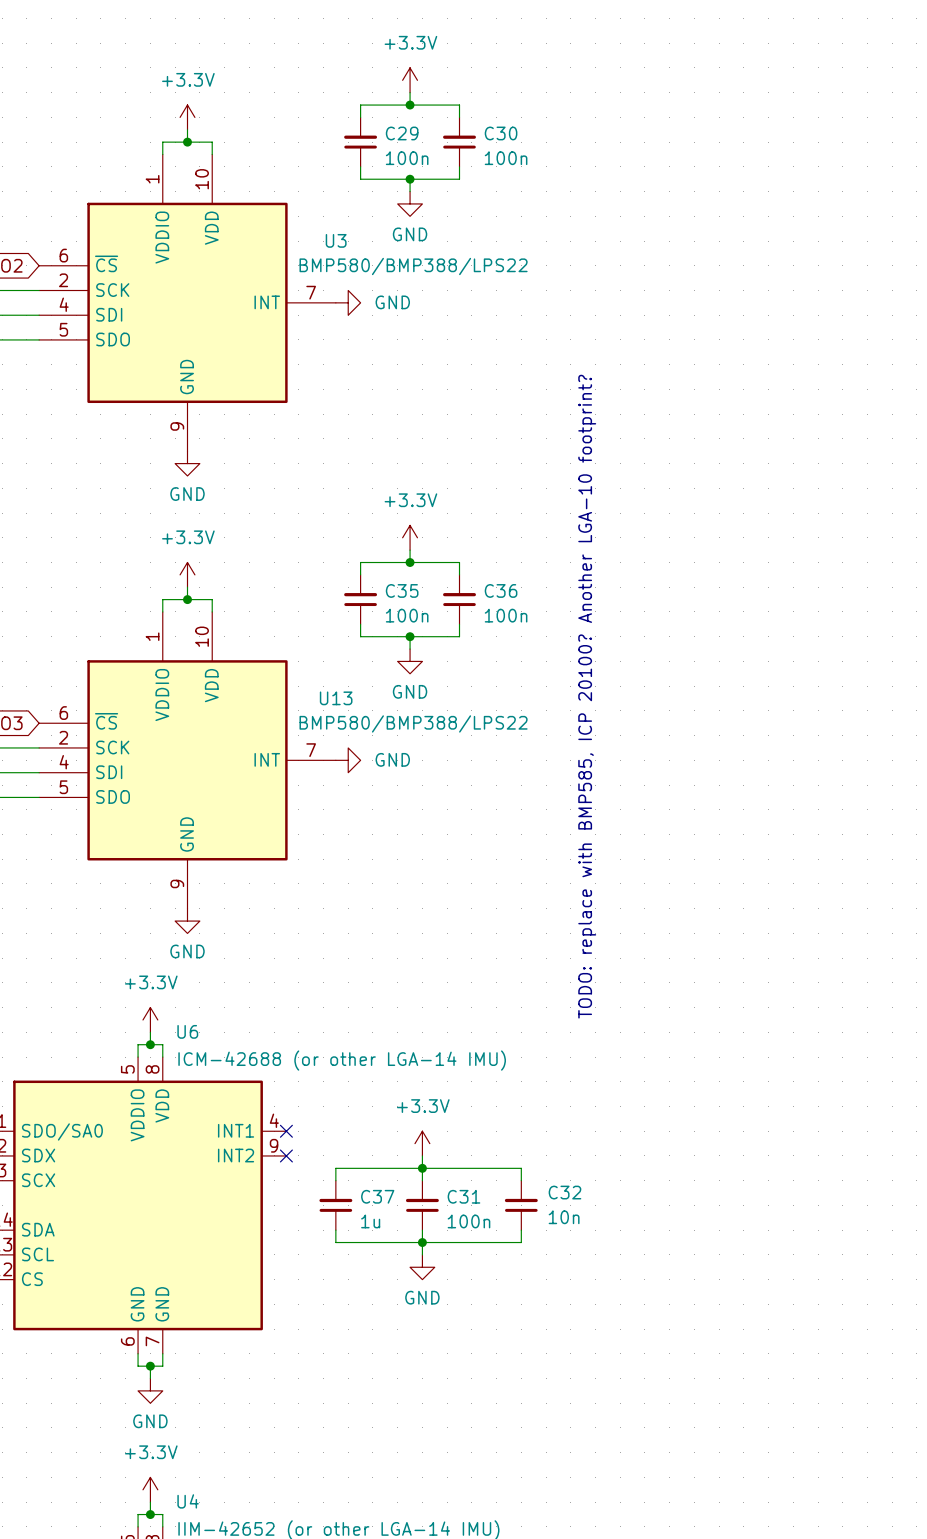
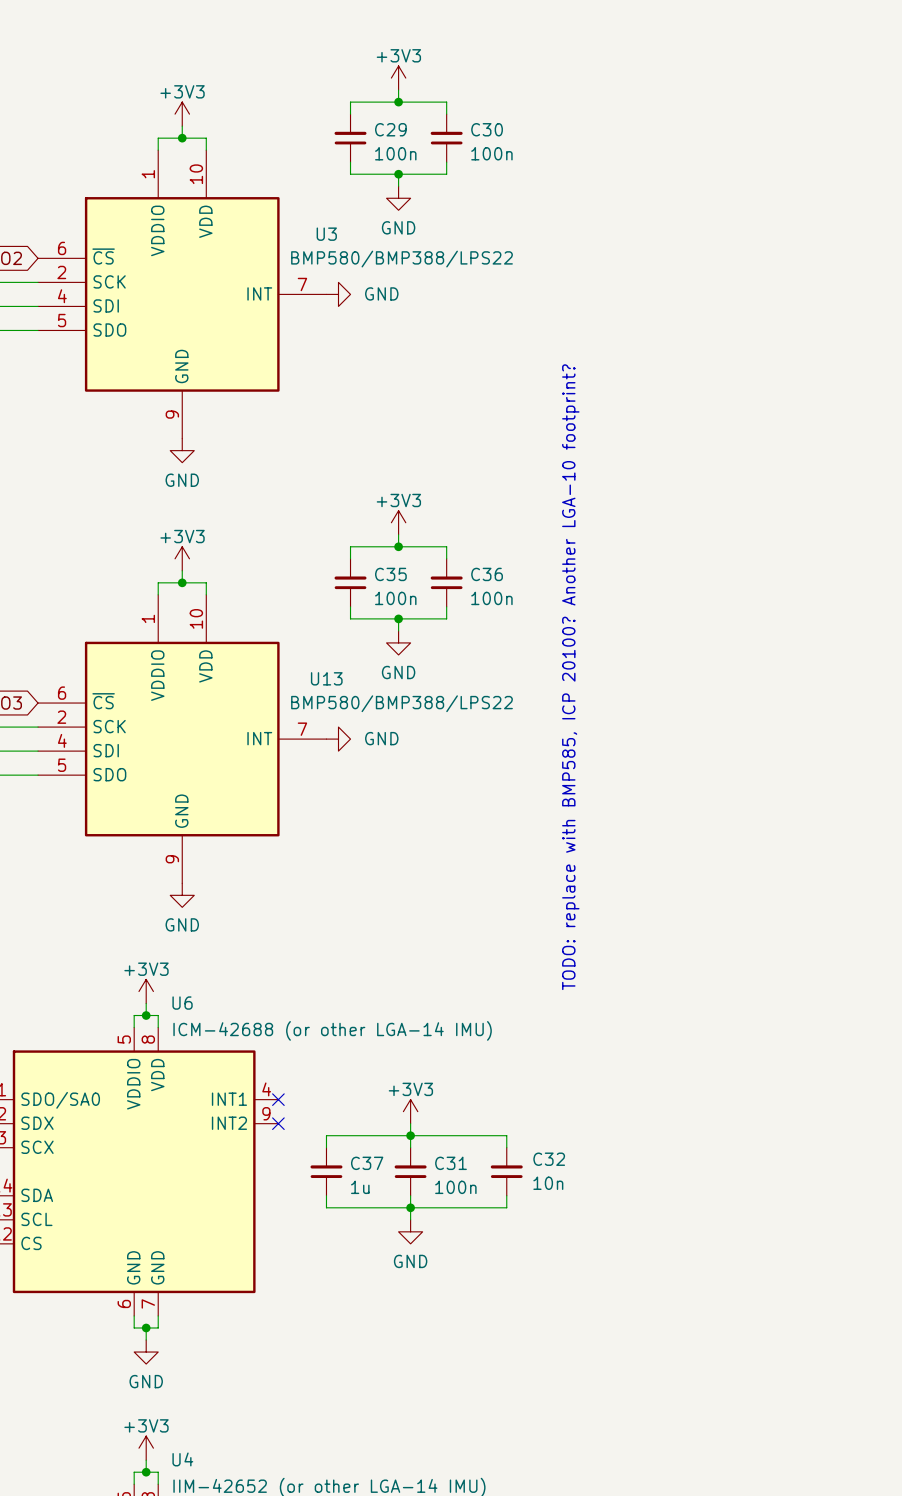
power symbol: +3.3V (410, 80) -> +3V3 (398, 78)
power symbol: +3.3V (187, 117) -> +3V3 (182, 114)
power symbol: +3.3V (410, 537) -> +3V3 (398, 522)
power symbol: +3.3V (187, 574) -> +3V3 (182, 558)
power symbol: +3.3V (150, 1019) -> +3V3 (146, 991)
power symbol: +3.3V (422, 1143) -> +3V3 (410, 1111)
power symbol: +3.3V (150, 1489) -> +3V3 (146, 1448)

